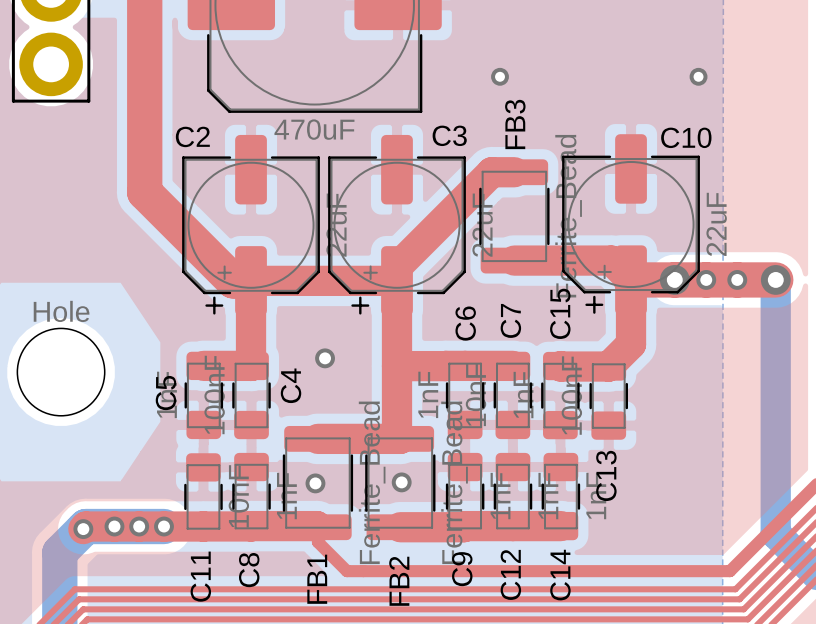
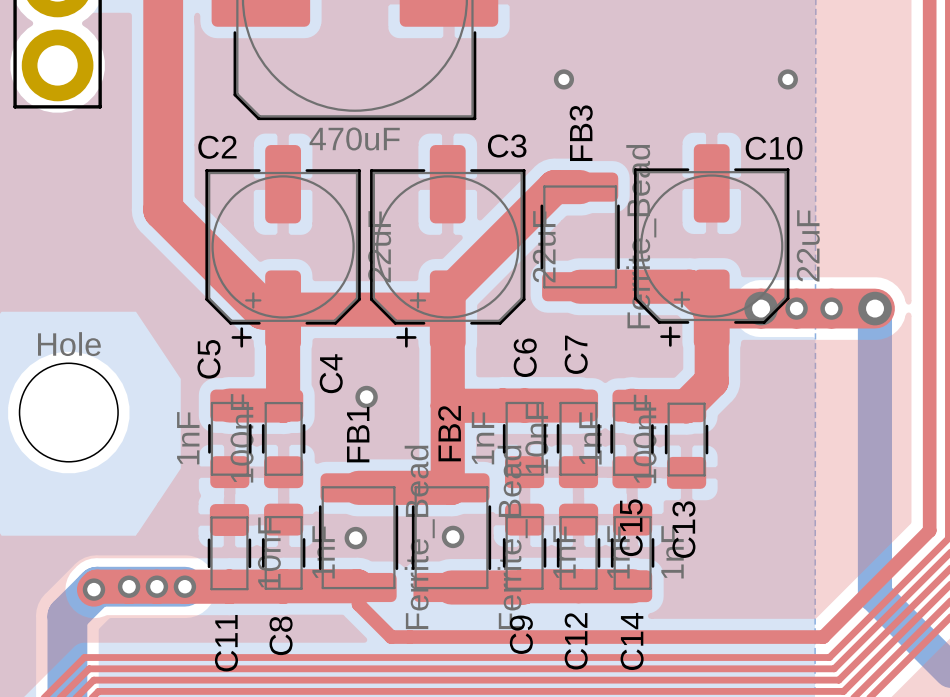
C15 name position: C15 (560, 313) -> C15 (631, 527)
C4 name position: C4 (291, 385) -> C4 (331, 373)
C5 name position: C5 (165, 393) -> C5 (208, 359)
FB1 name position: FB1 (317, 579) -> FB1 (358, 434)
FB2 name position: FB2 (399, 581) -> FB2 (449, 433)

